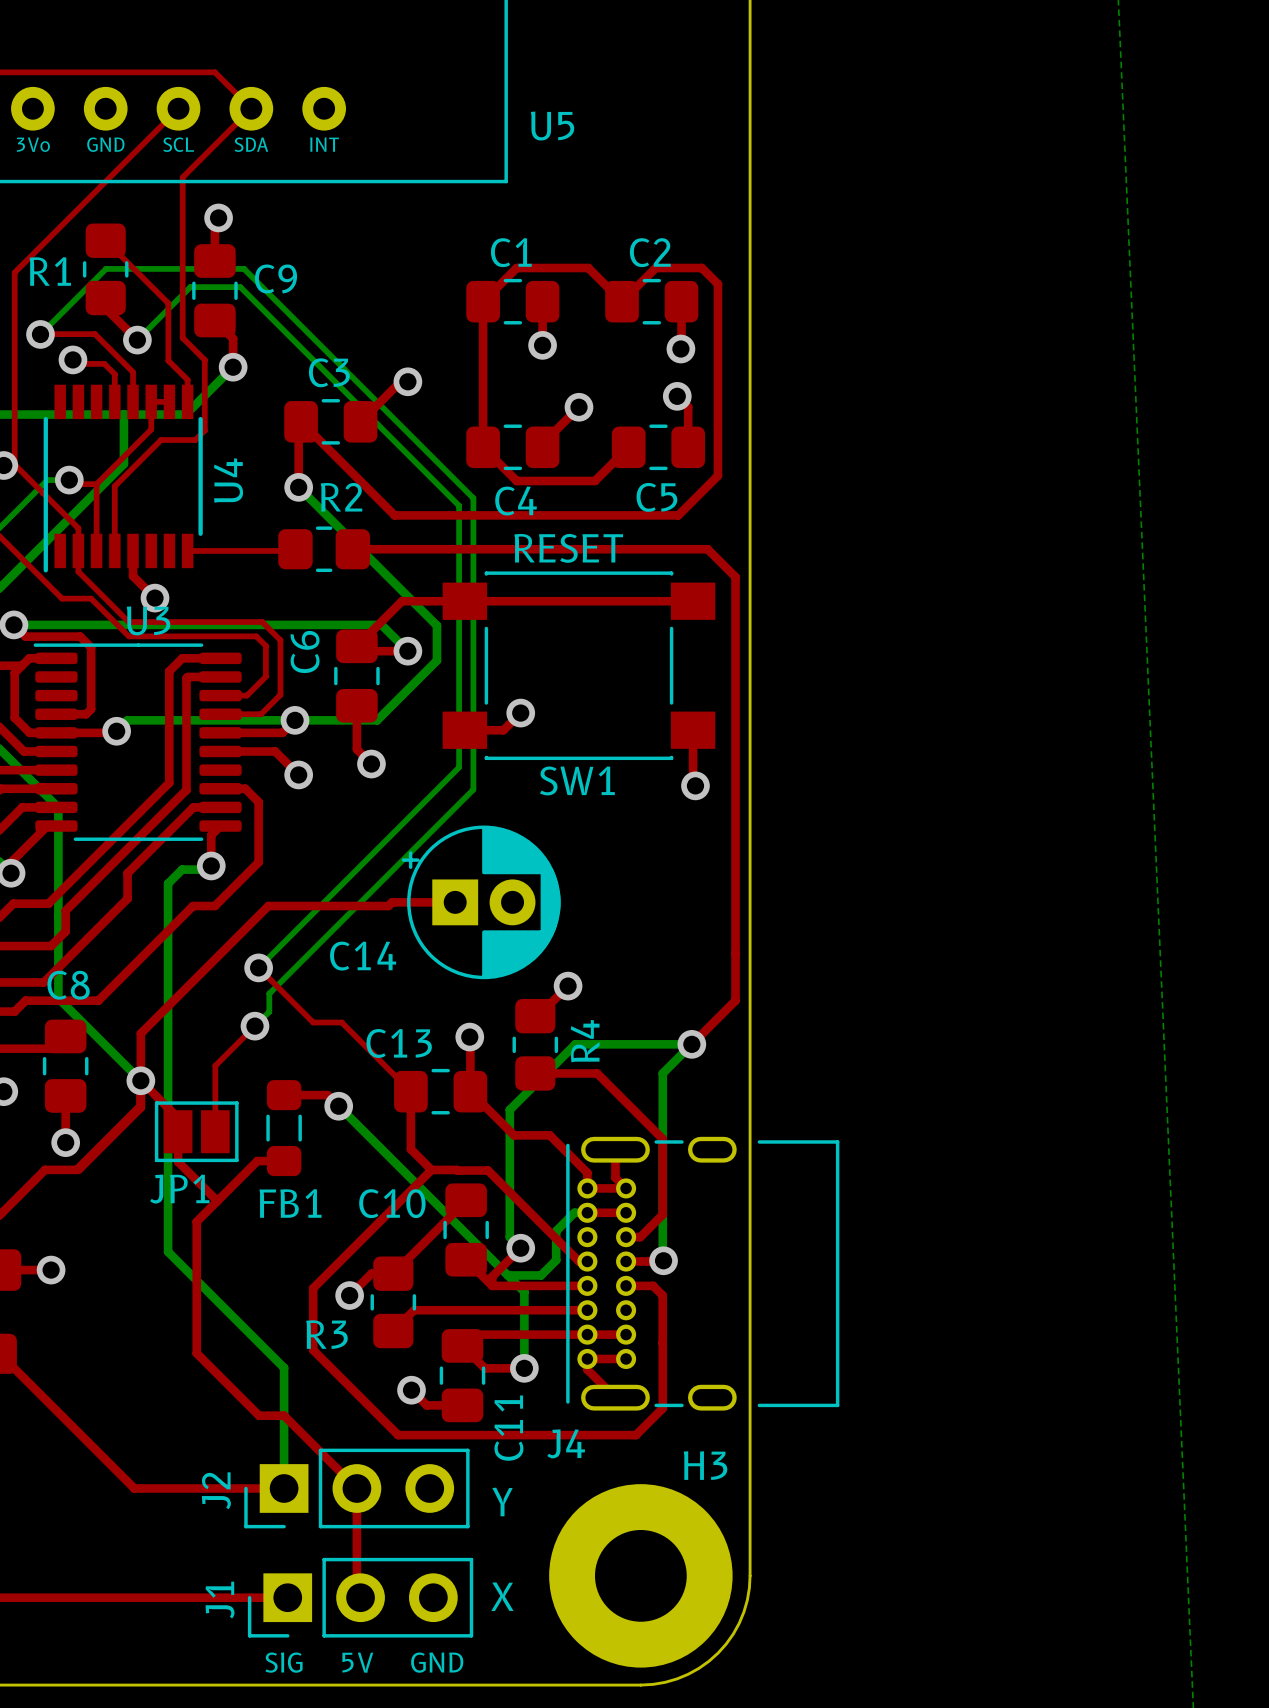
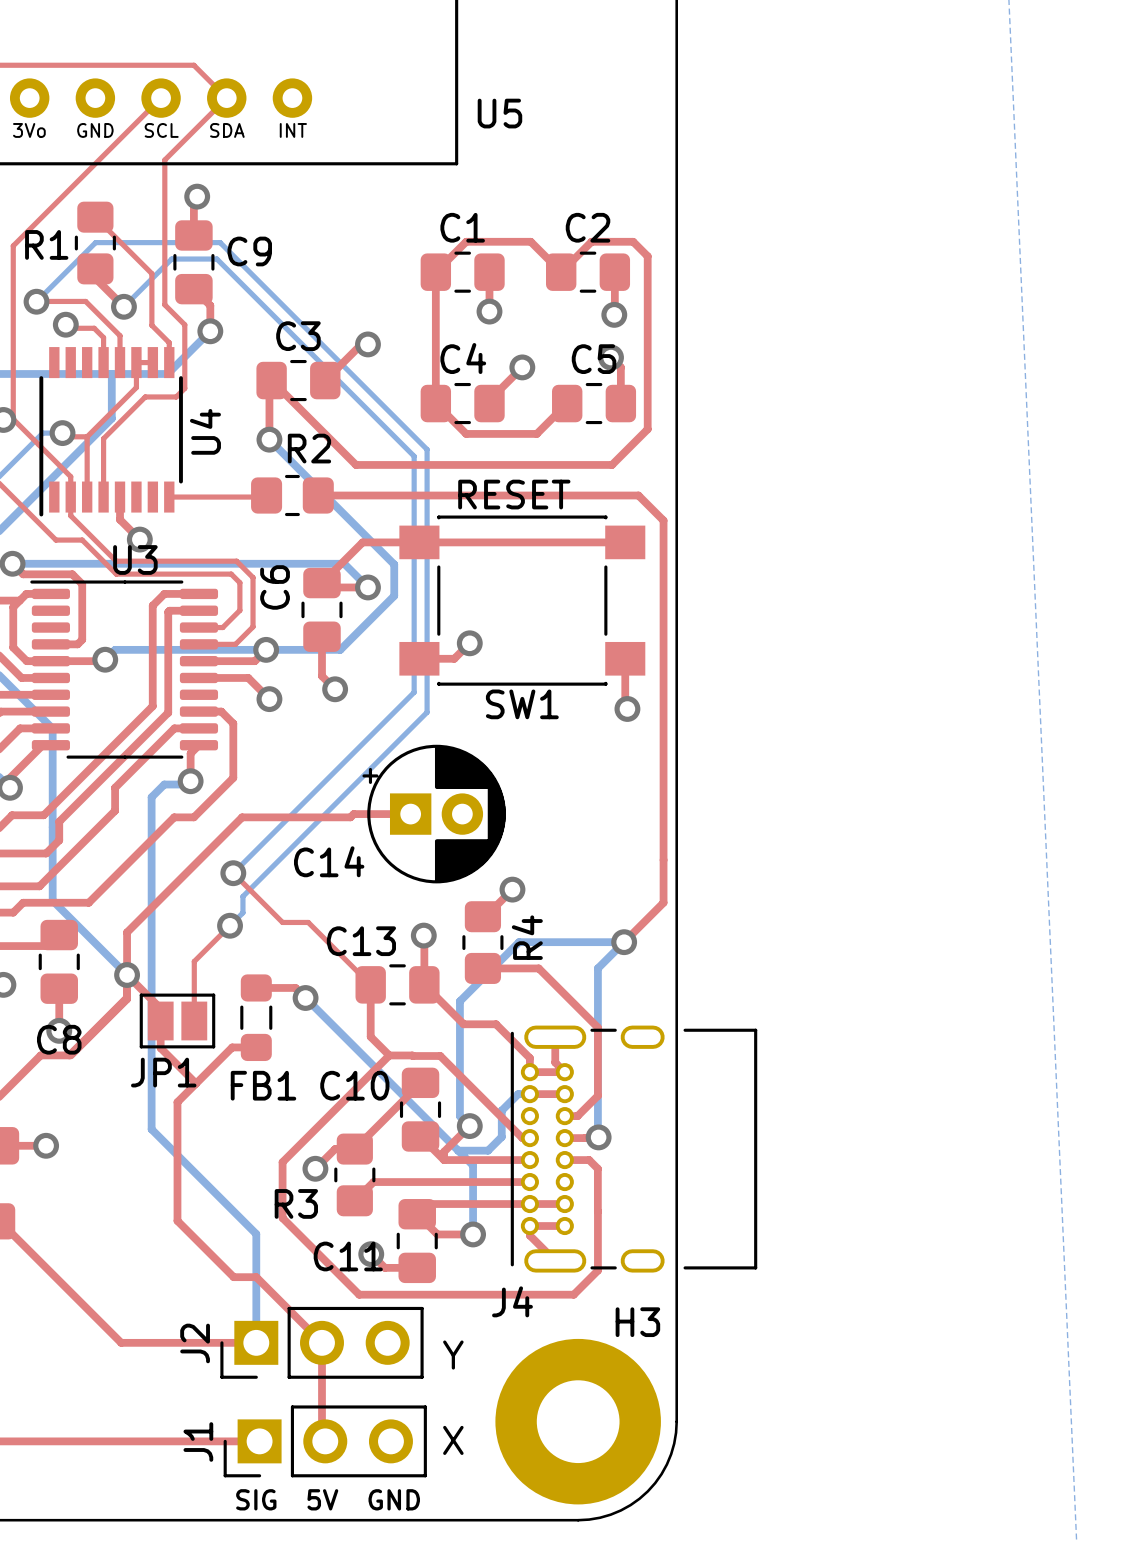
C5 name position: C5 (656, 497) -> C5 (594, 359)
C4 name position: C4 (516, 501) -> C4 (463, 358)
C8 name position: C8 (68, 985) -> C8 (59, 1039)
C11 name rotation: 0° (508, 1428) -> 90° clockwise (348, 1256)
C11 name position: C11 (508, 1428) -> C11 (348, 1256)

